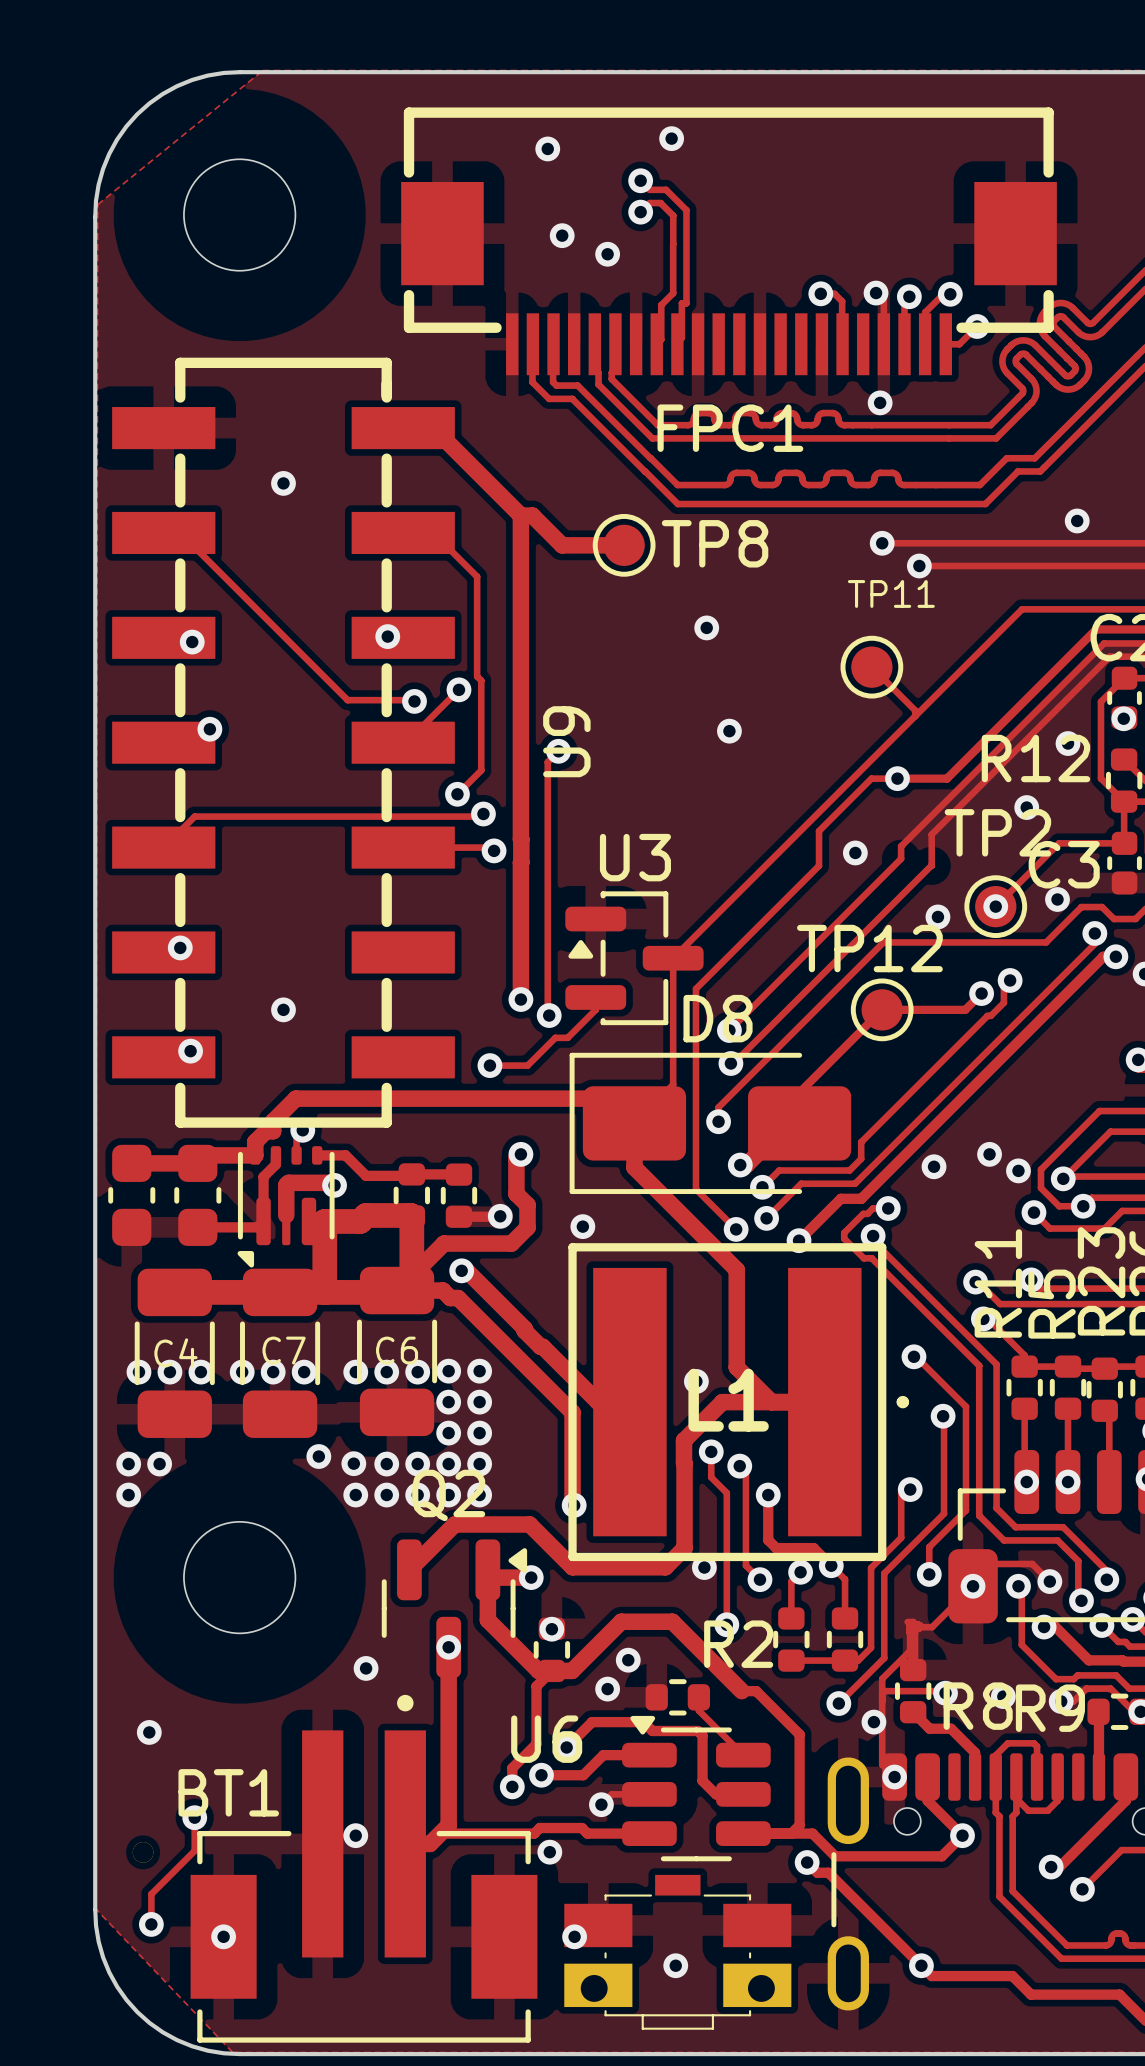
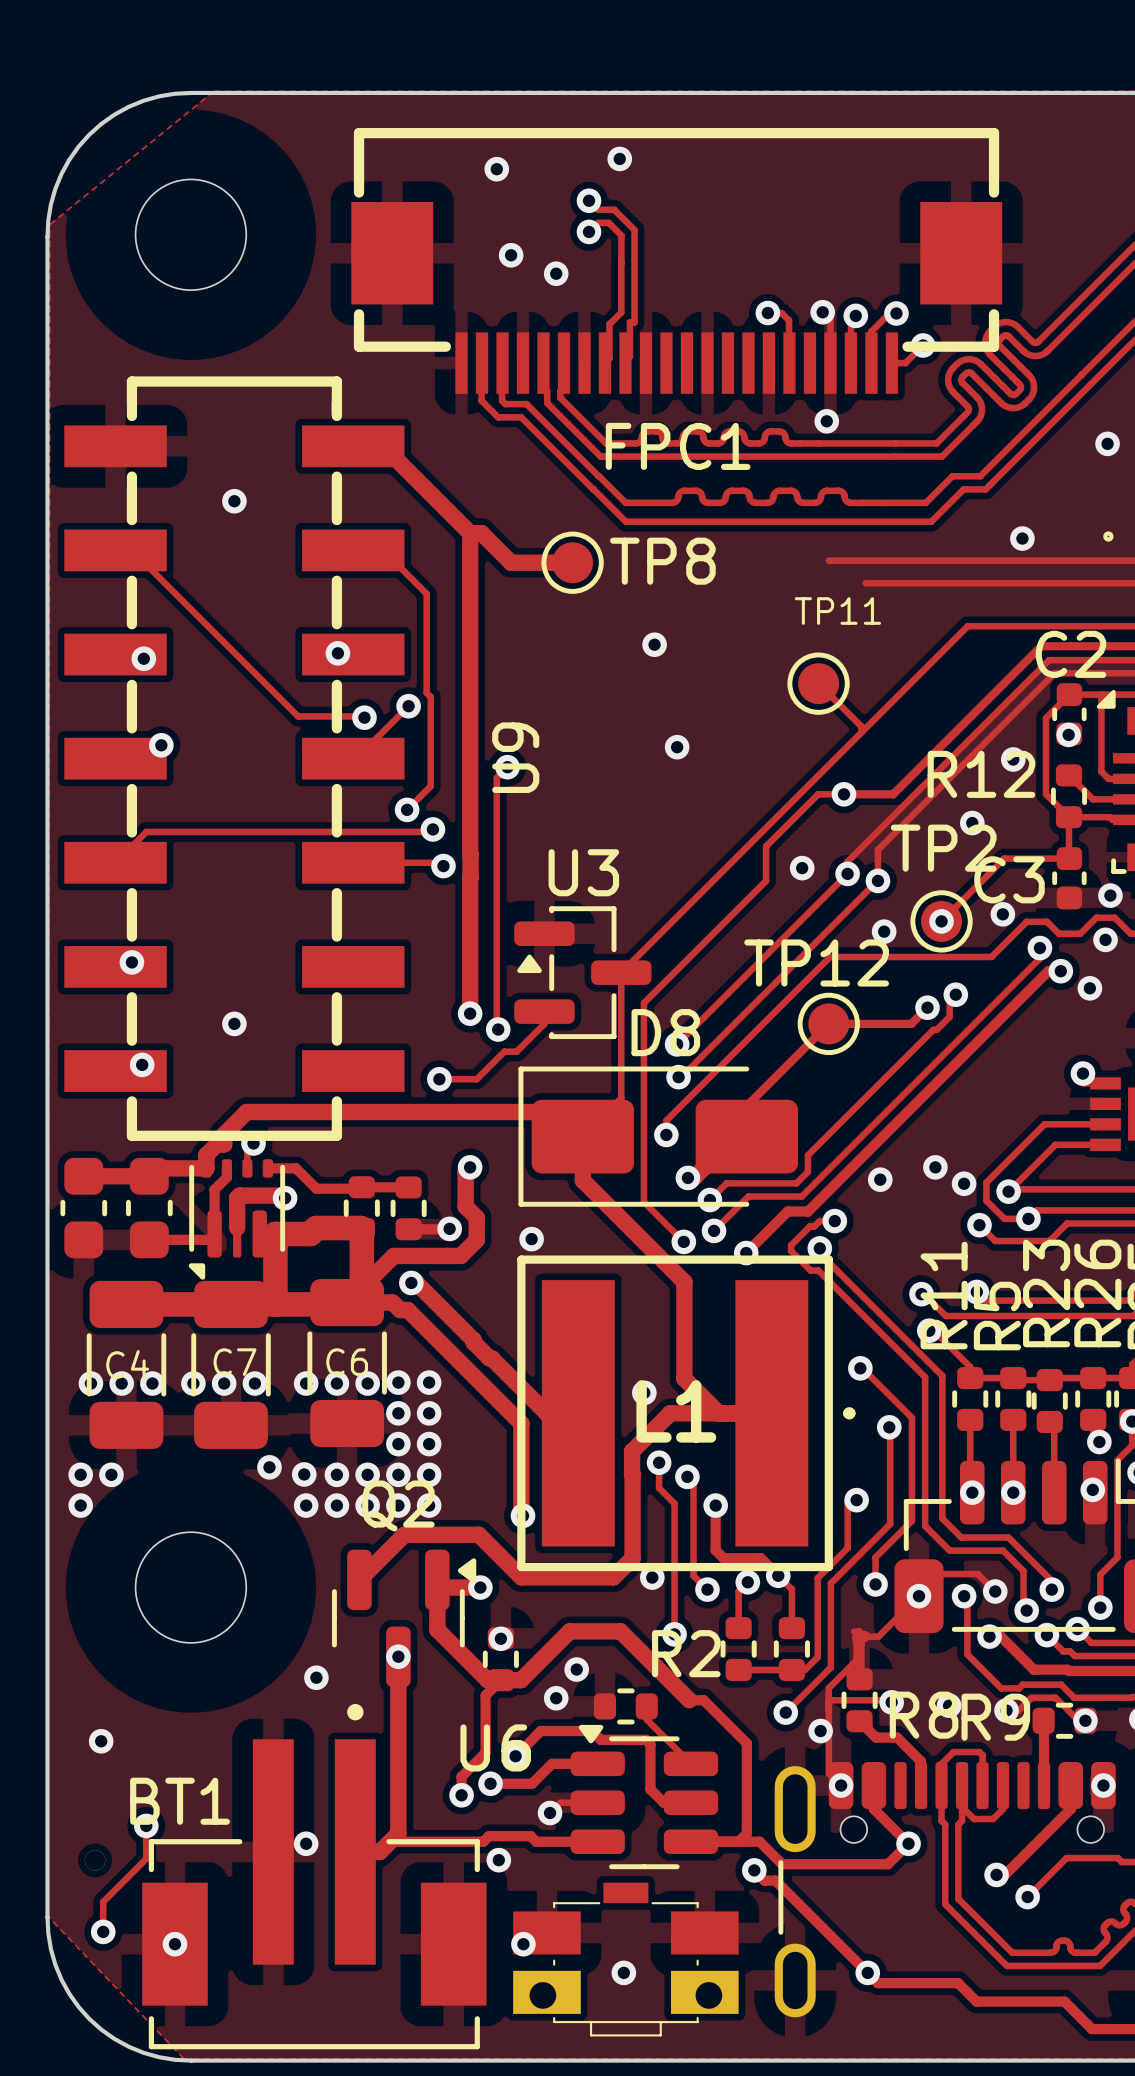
via: (882, 543) -> none
via: (919, 565) -> none
via: none -> (847, 873)
via: none -> (877, 880)

